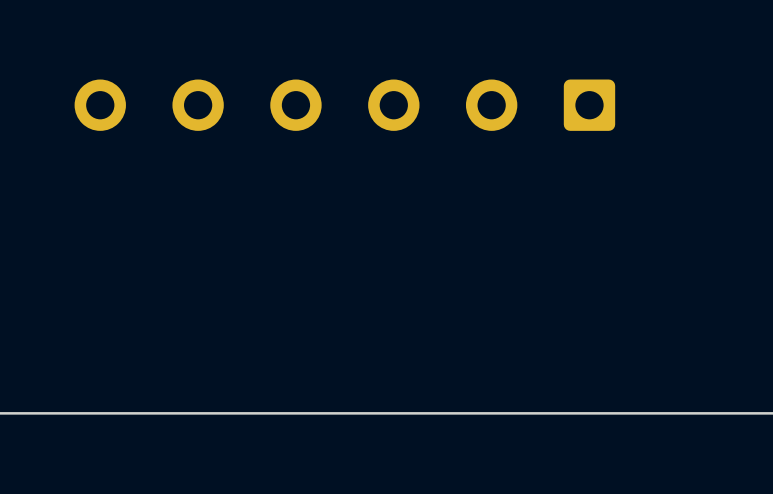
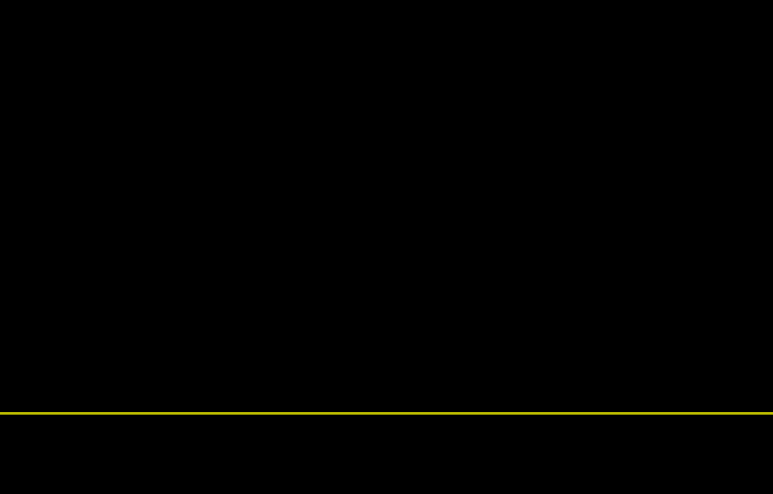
part: (344, 105) -> none

